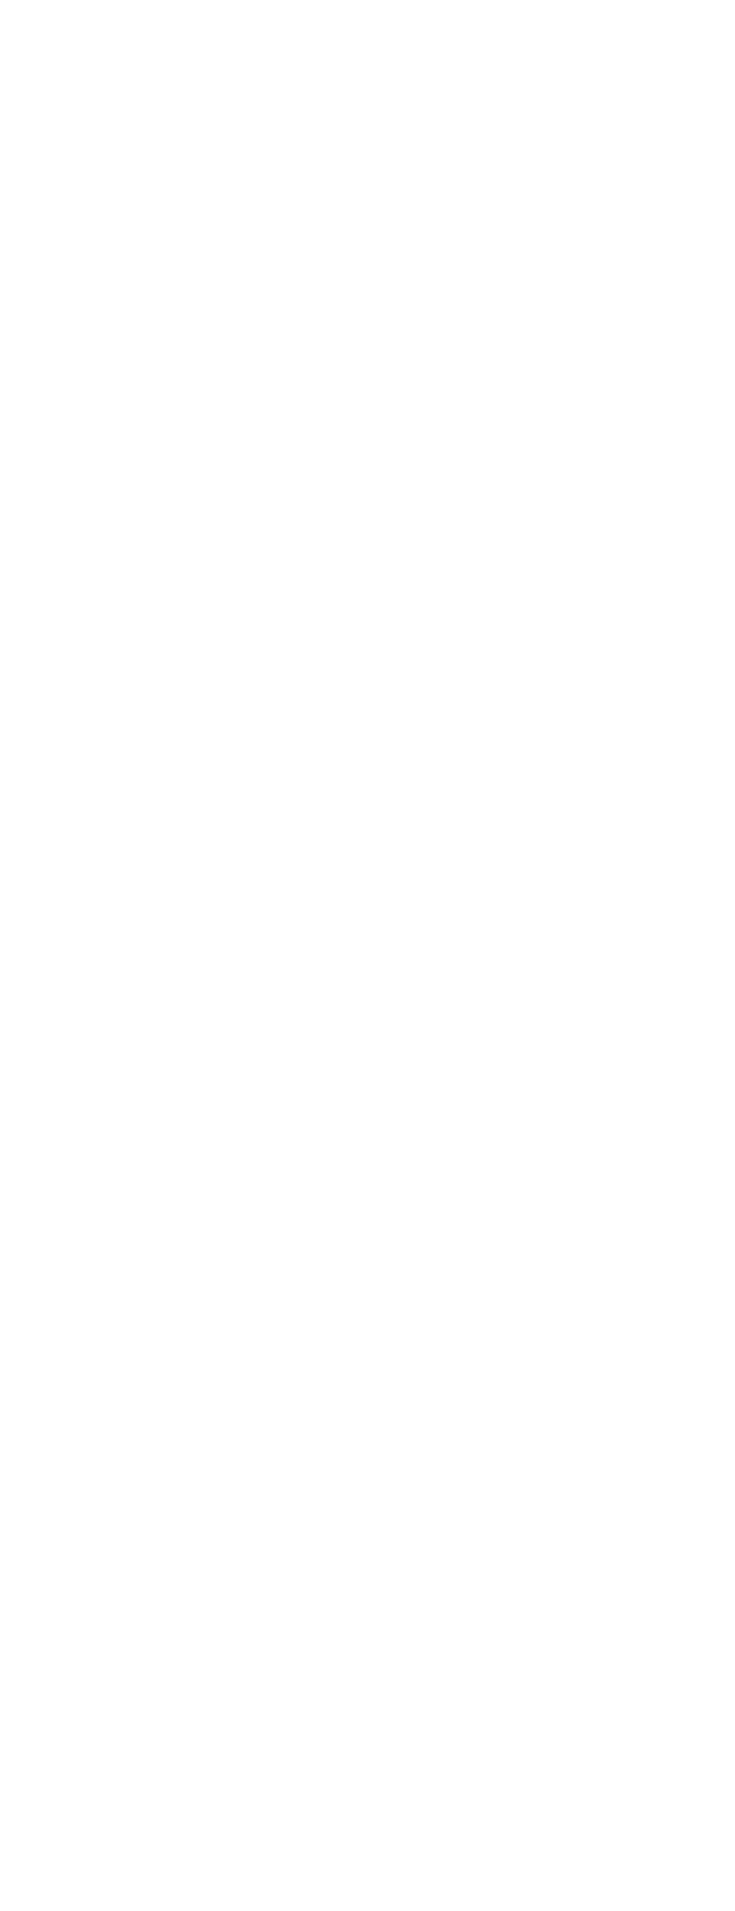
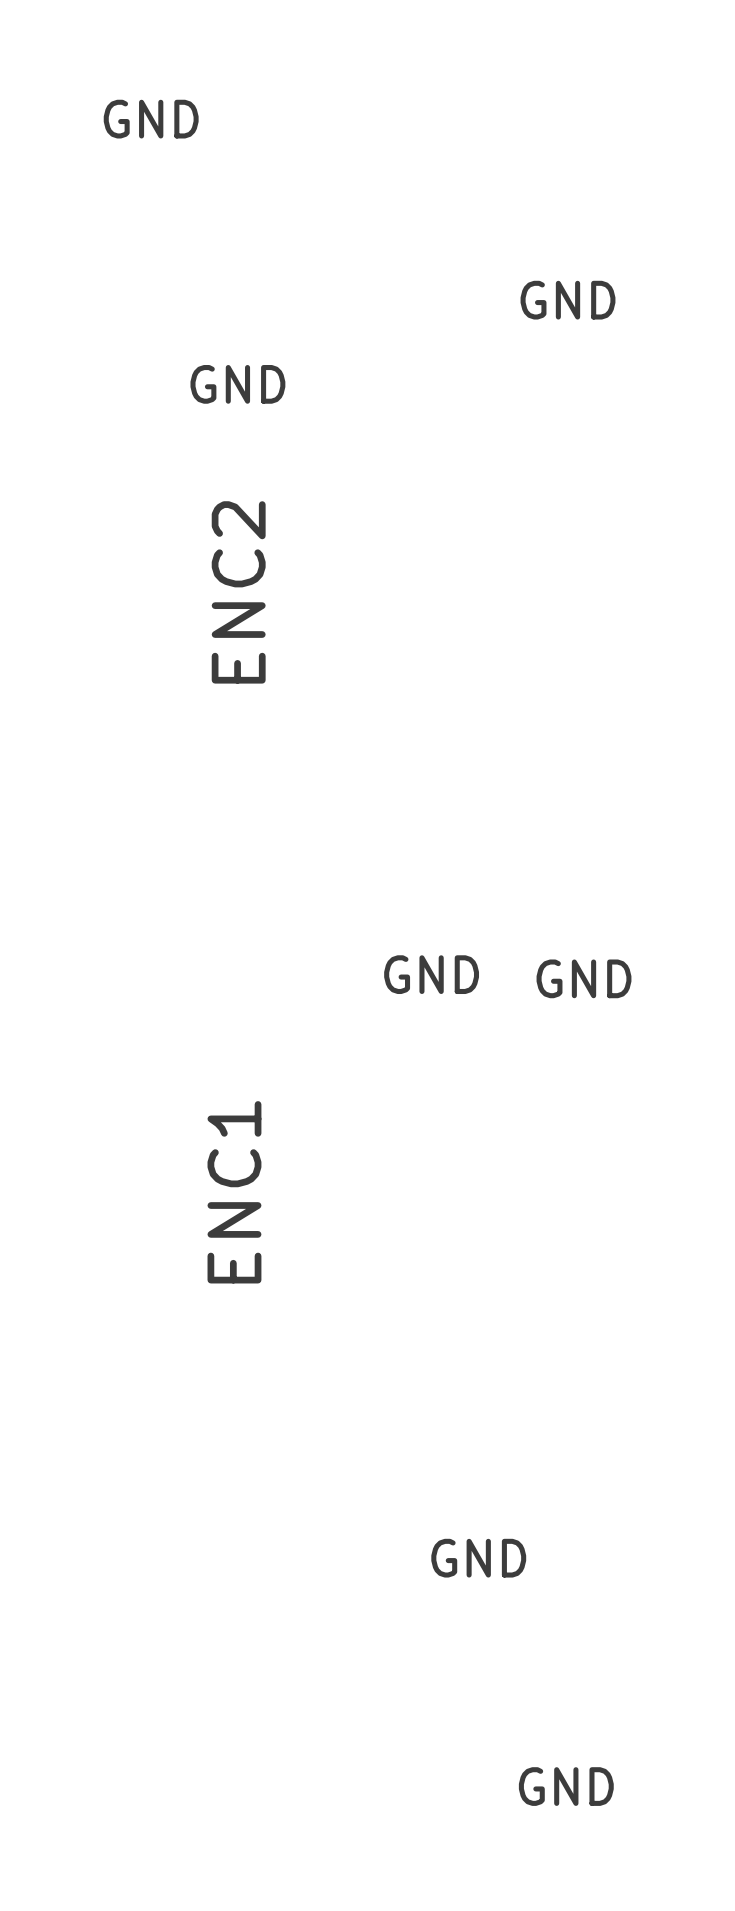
text: none -> GND (151, 119)
text: none -> GND (568, 300)
text: none -> GND (237, 384)
text: none -> ENC2 (238, 592)
text: none -> GND (431, 974)
text: none -> GND (584, 978)
text: none -> ENC1 (234, 1192)
text: none -> GND (478, 1558)
text: none -> GND (566, 1786)

